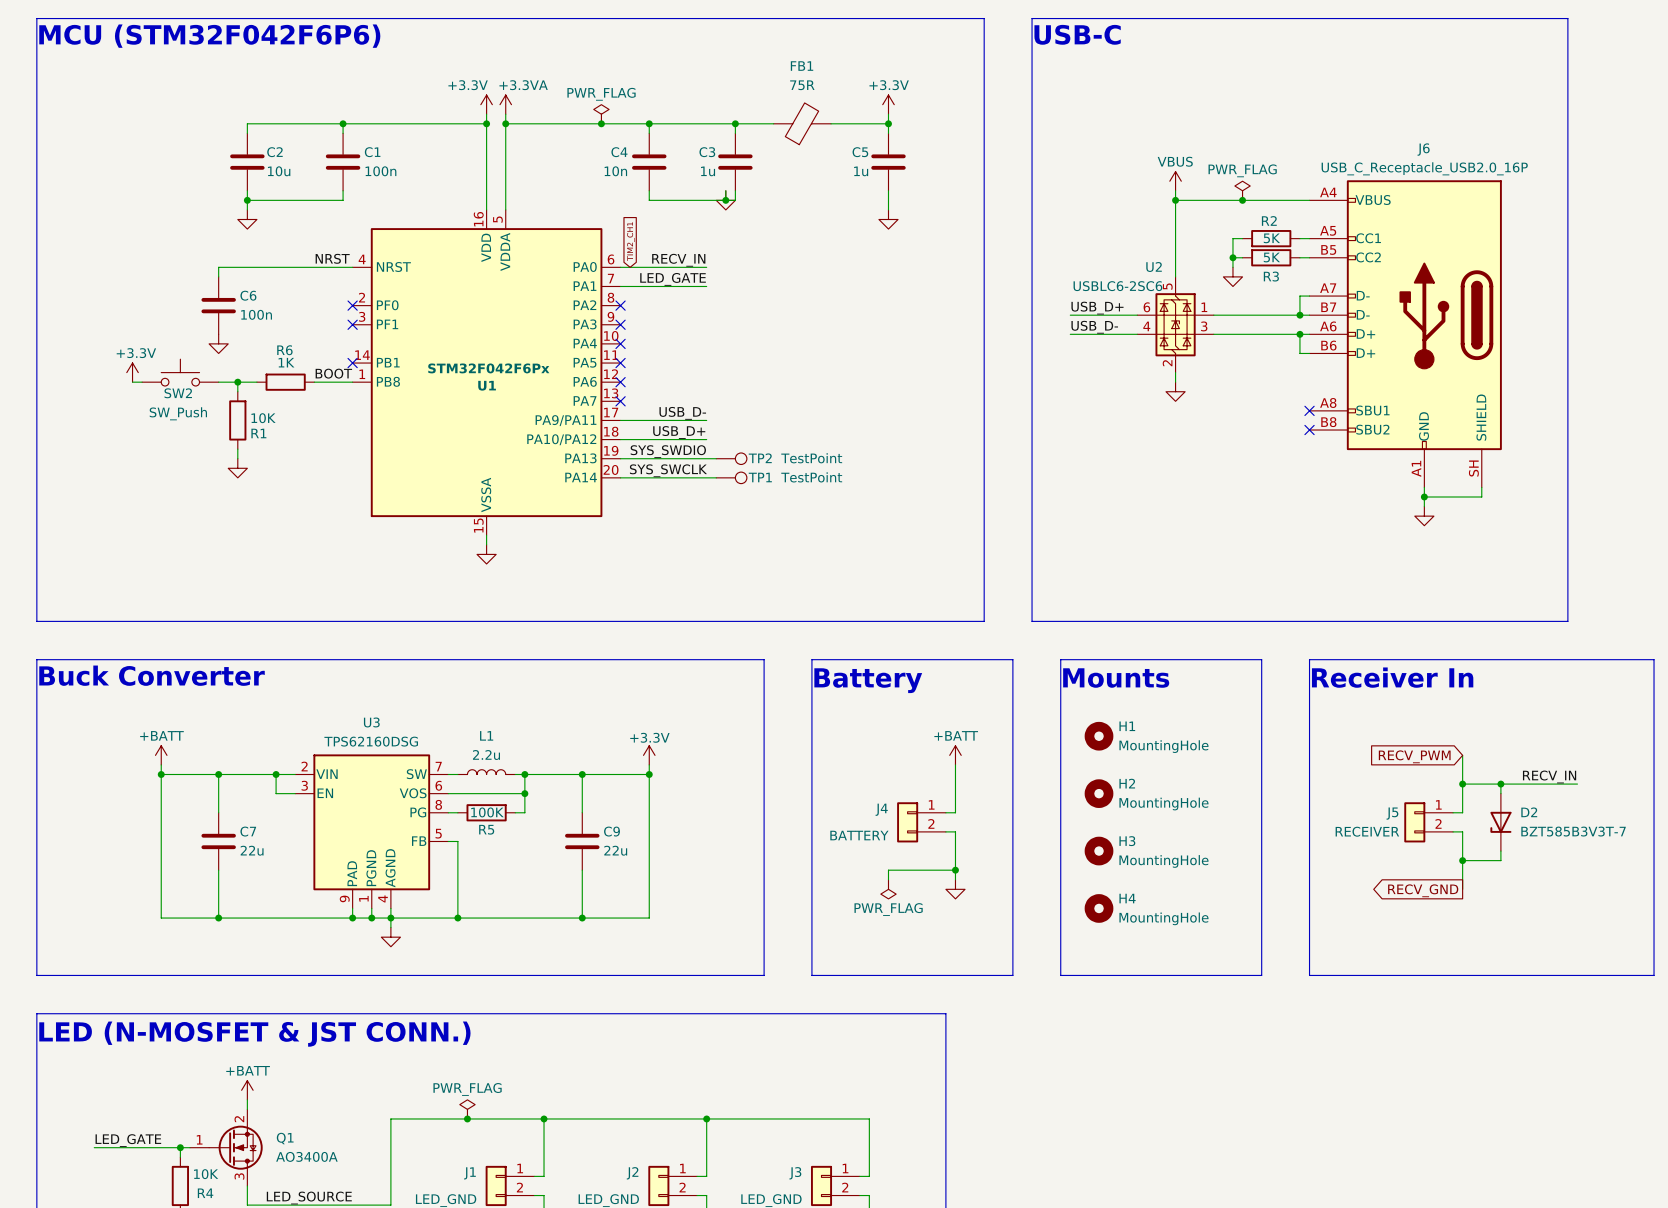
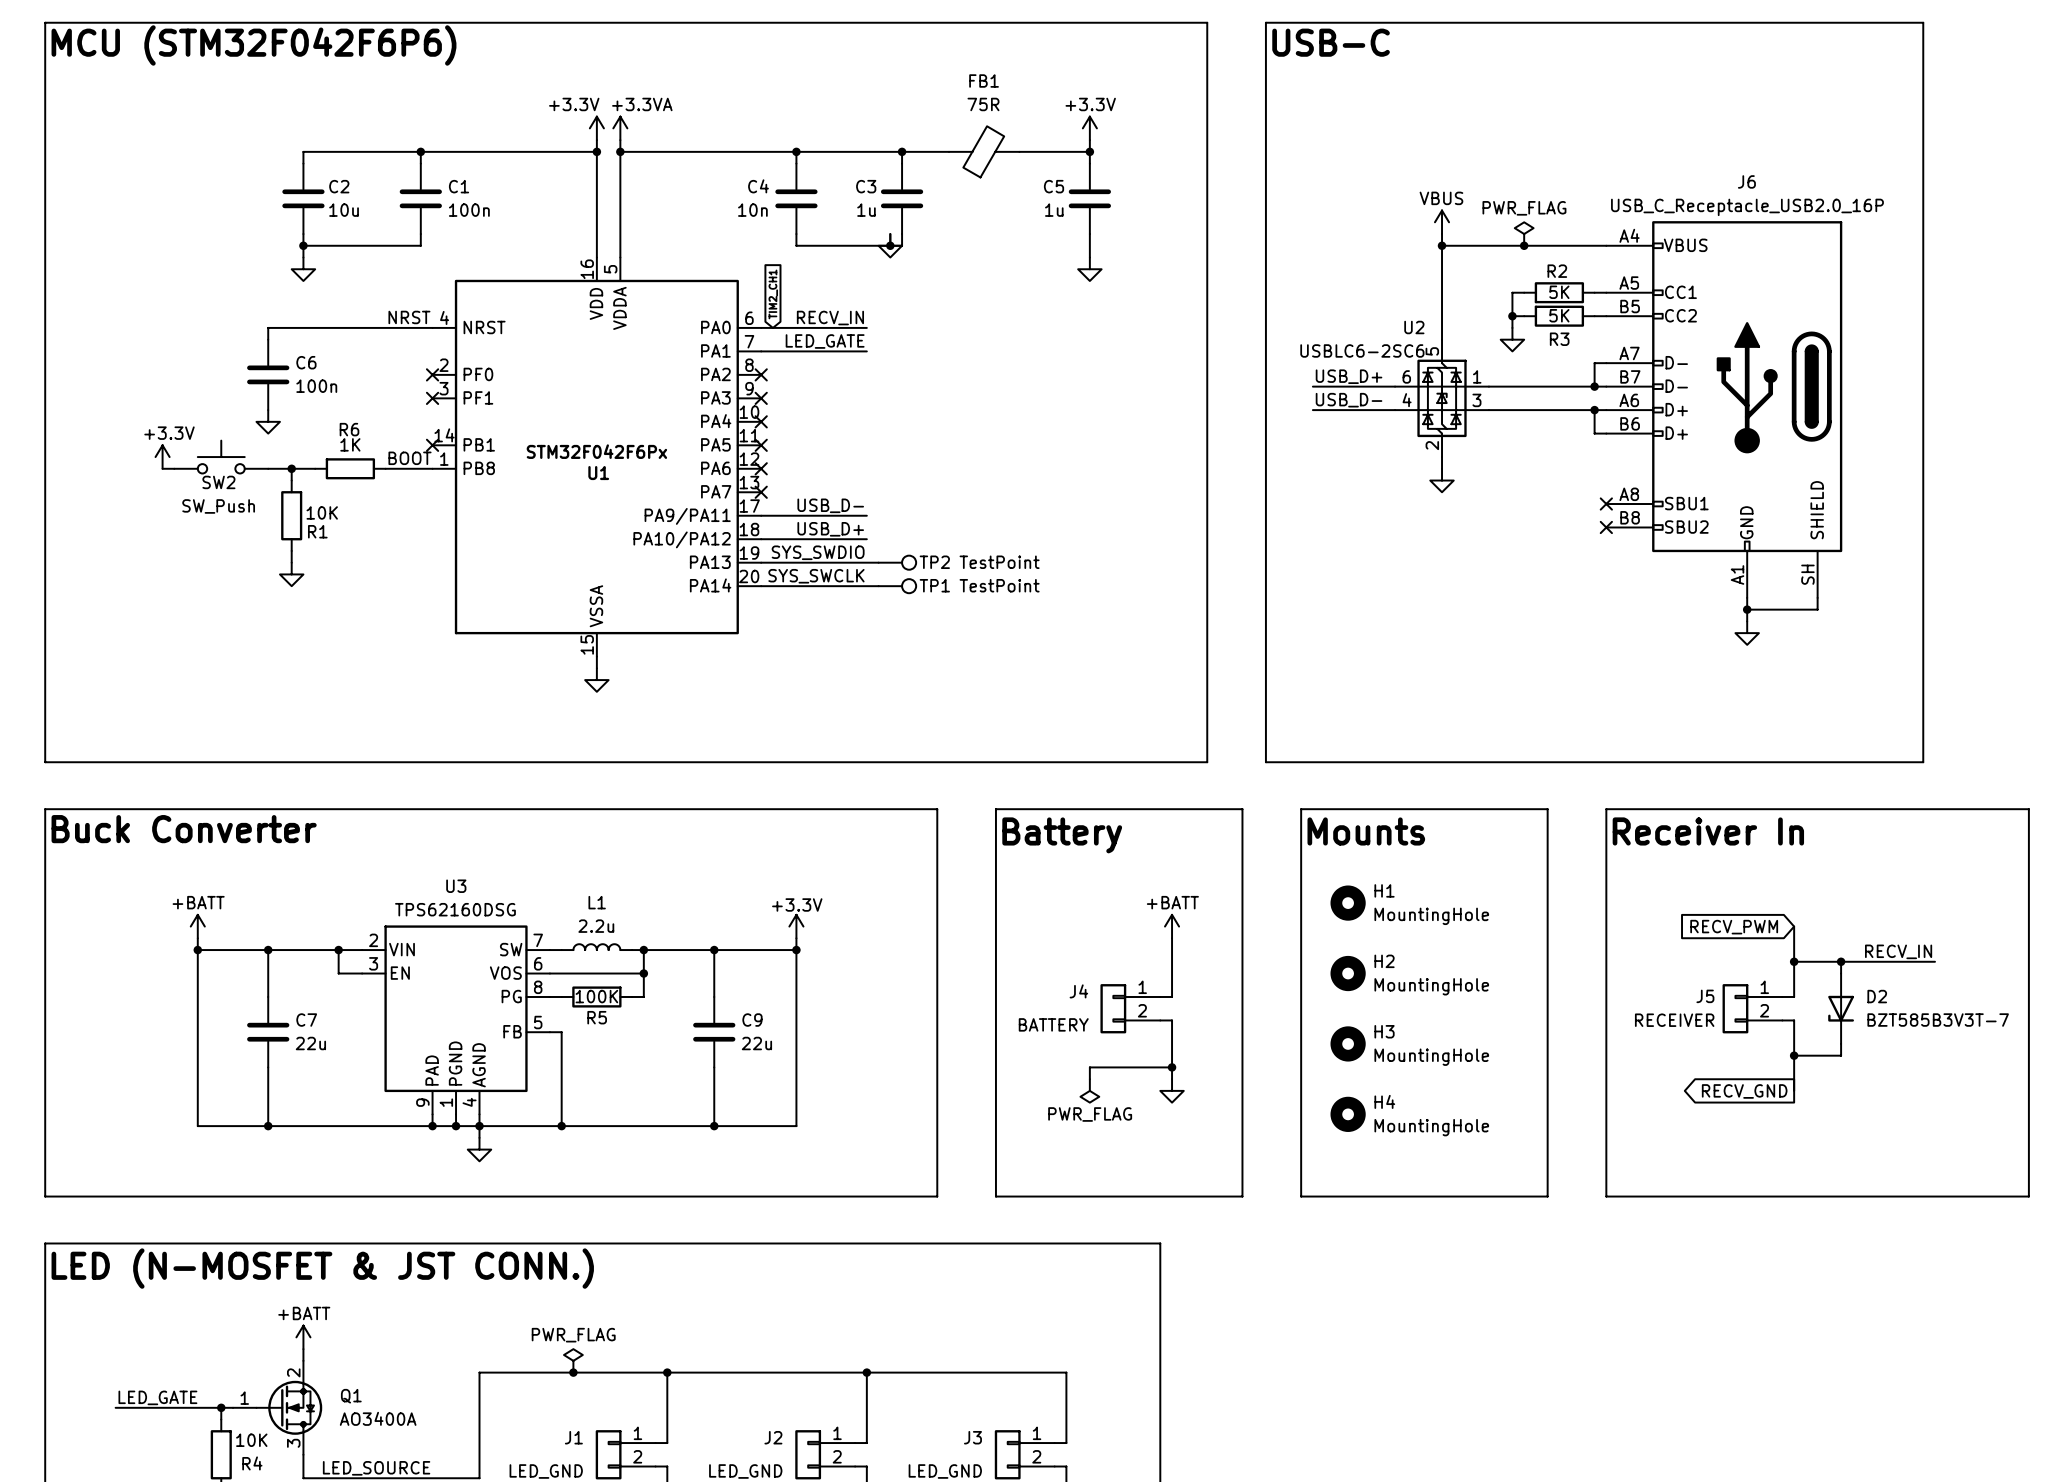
power symbol: PWR_FLAG (601, 114) -> none
junction: (601, 123) -> none

